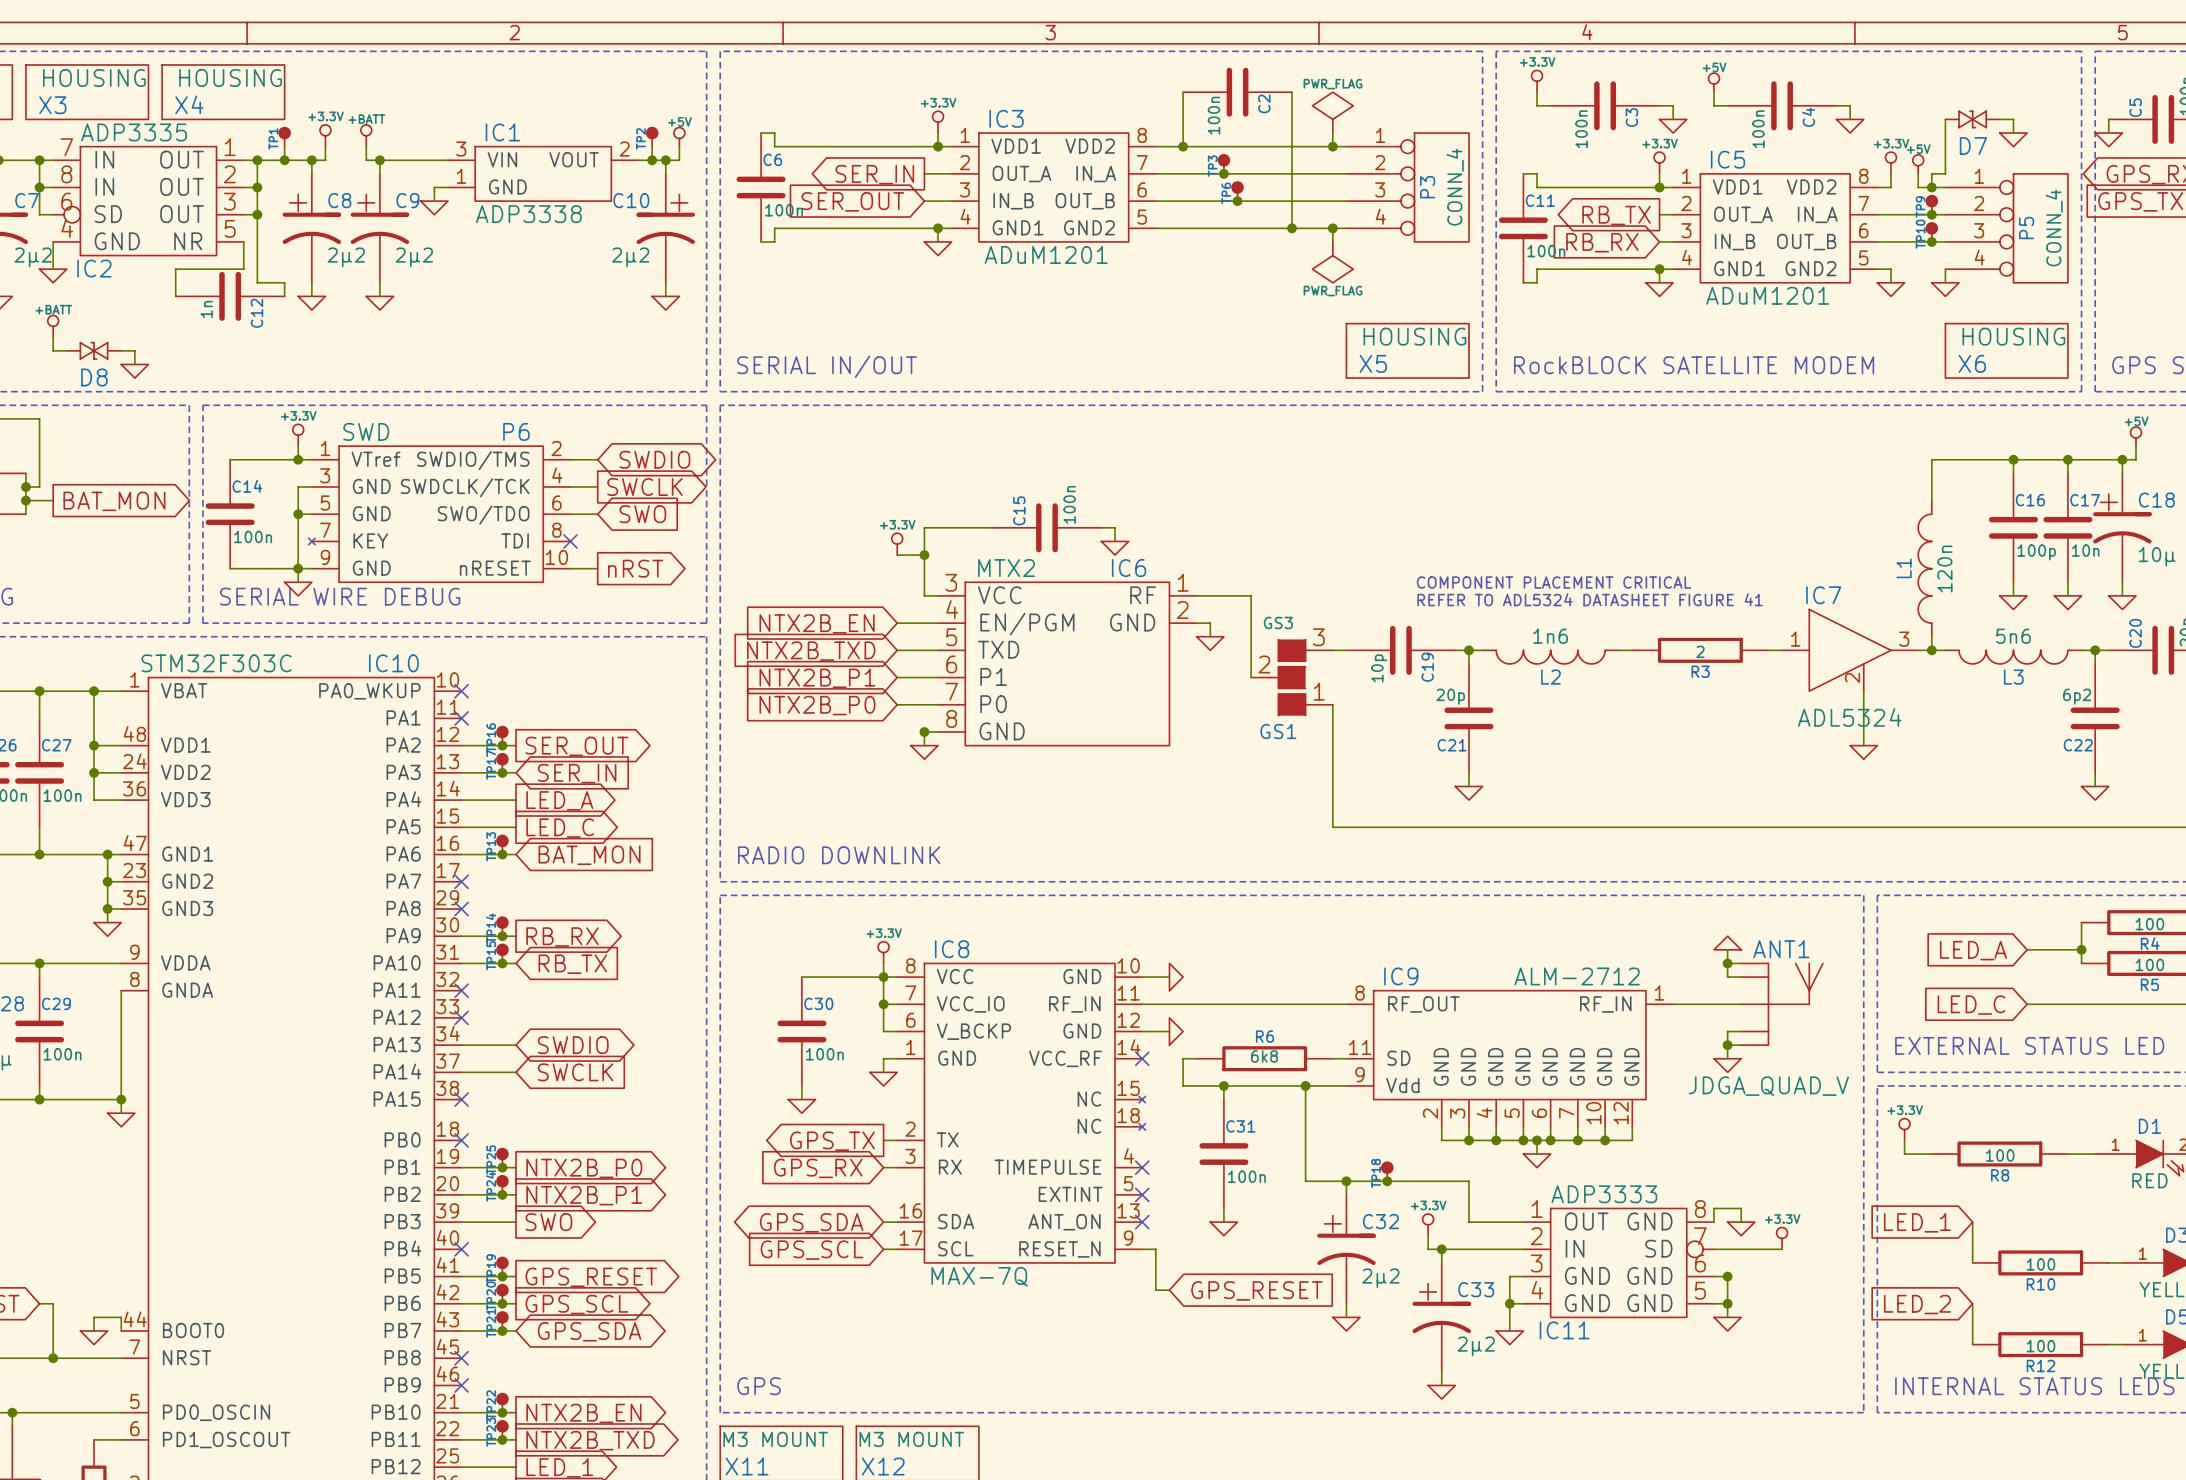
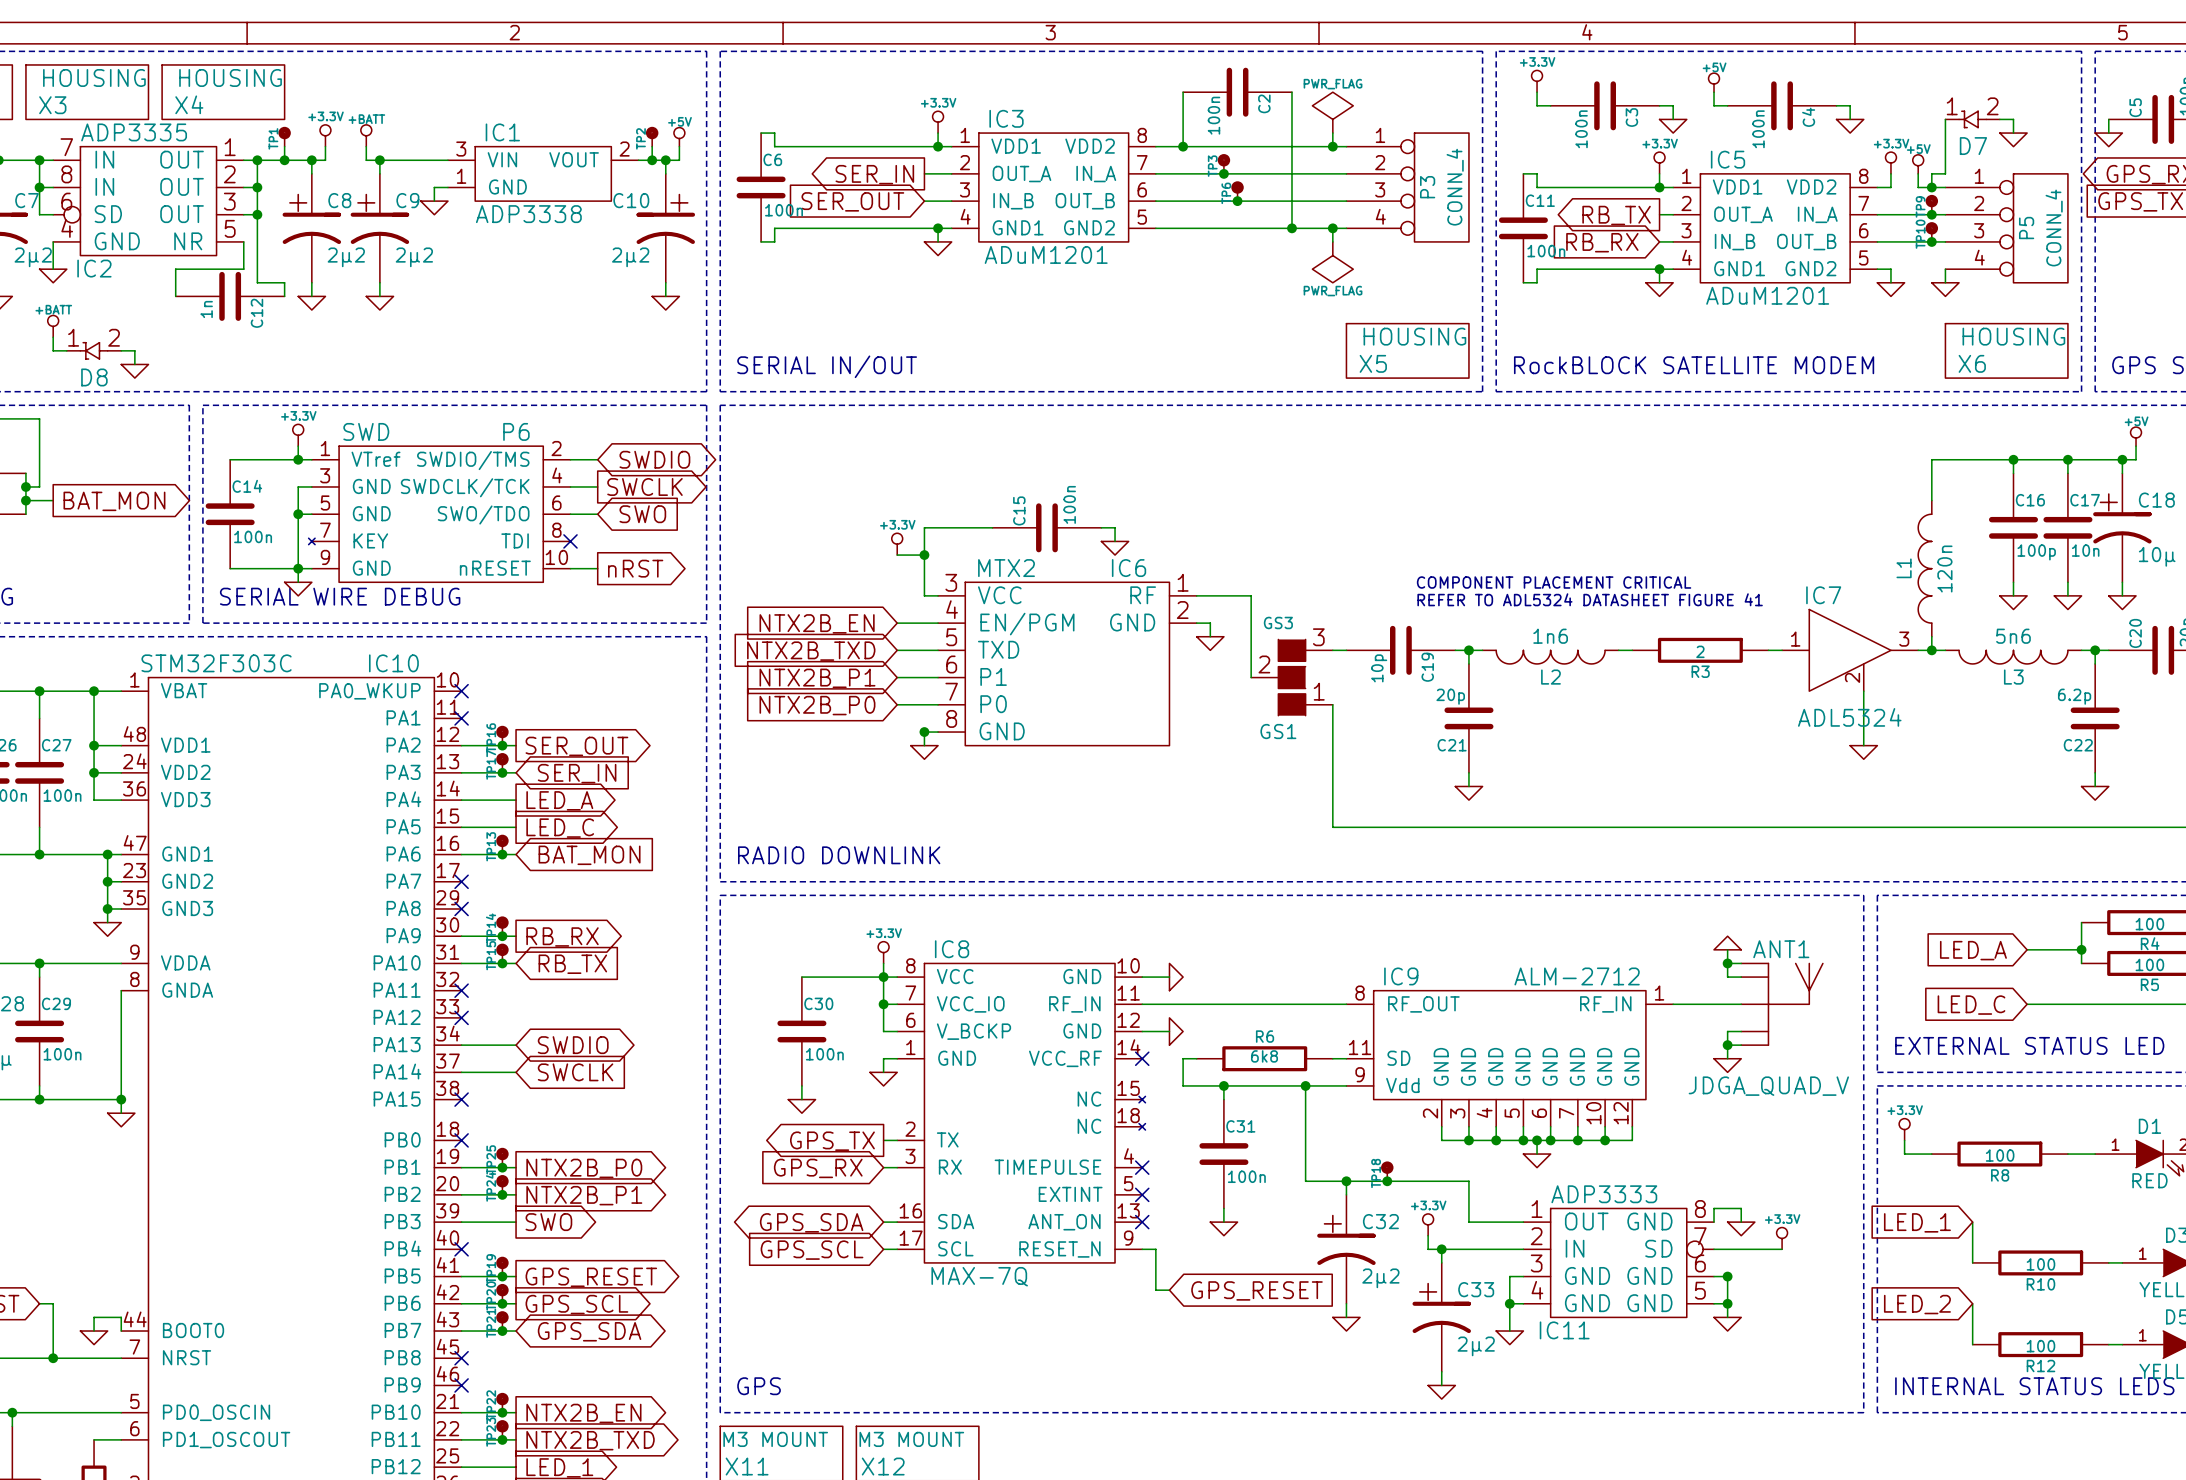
D7 symbol: [1945, 111, 2000, 128] -> [1945, 111, 2000, 128]
D8 symbol: [66, 342, 122, 360] -> [66, 342, 122, 360]
C22 value: 6p2 (2077, 696) -> 6.2p (2074, 696)

